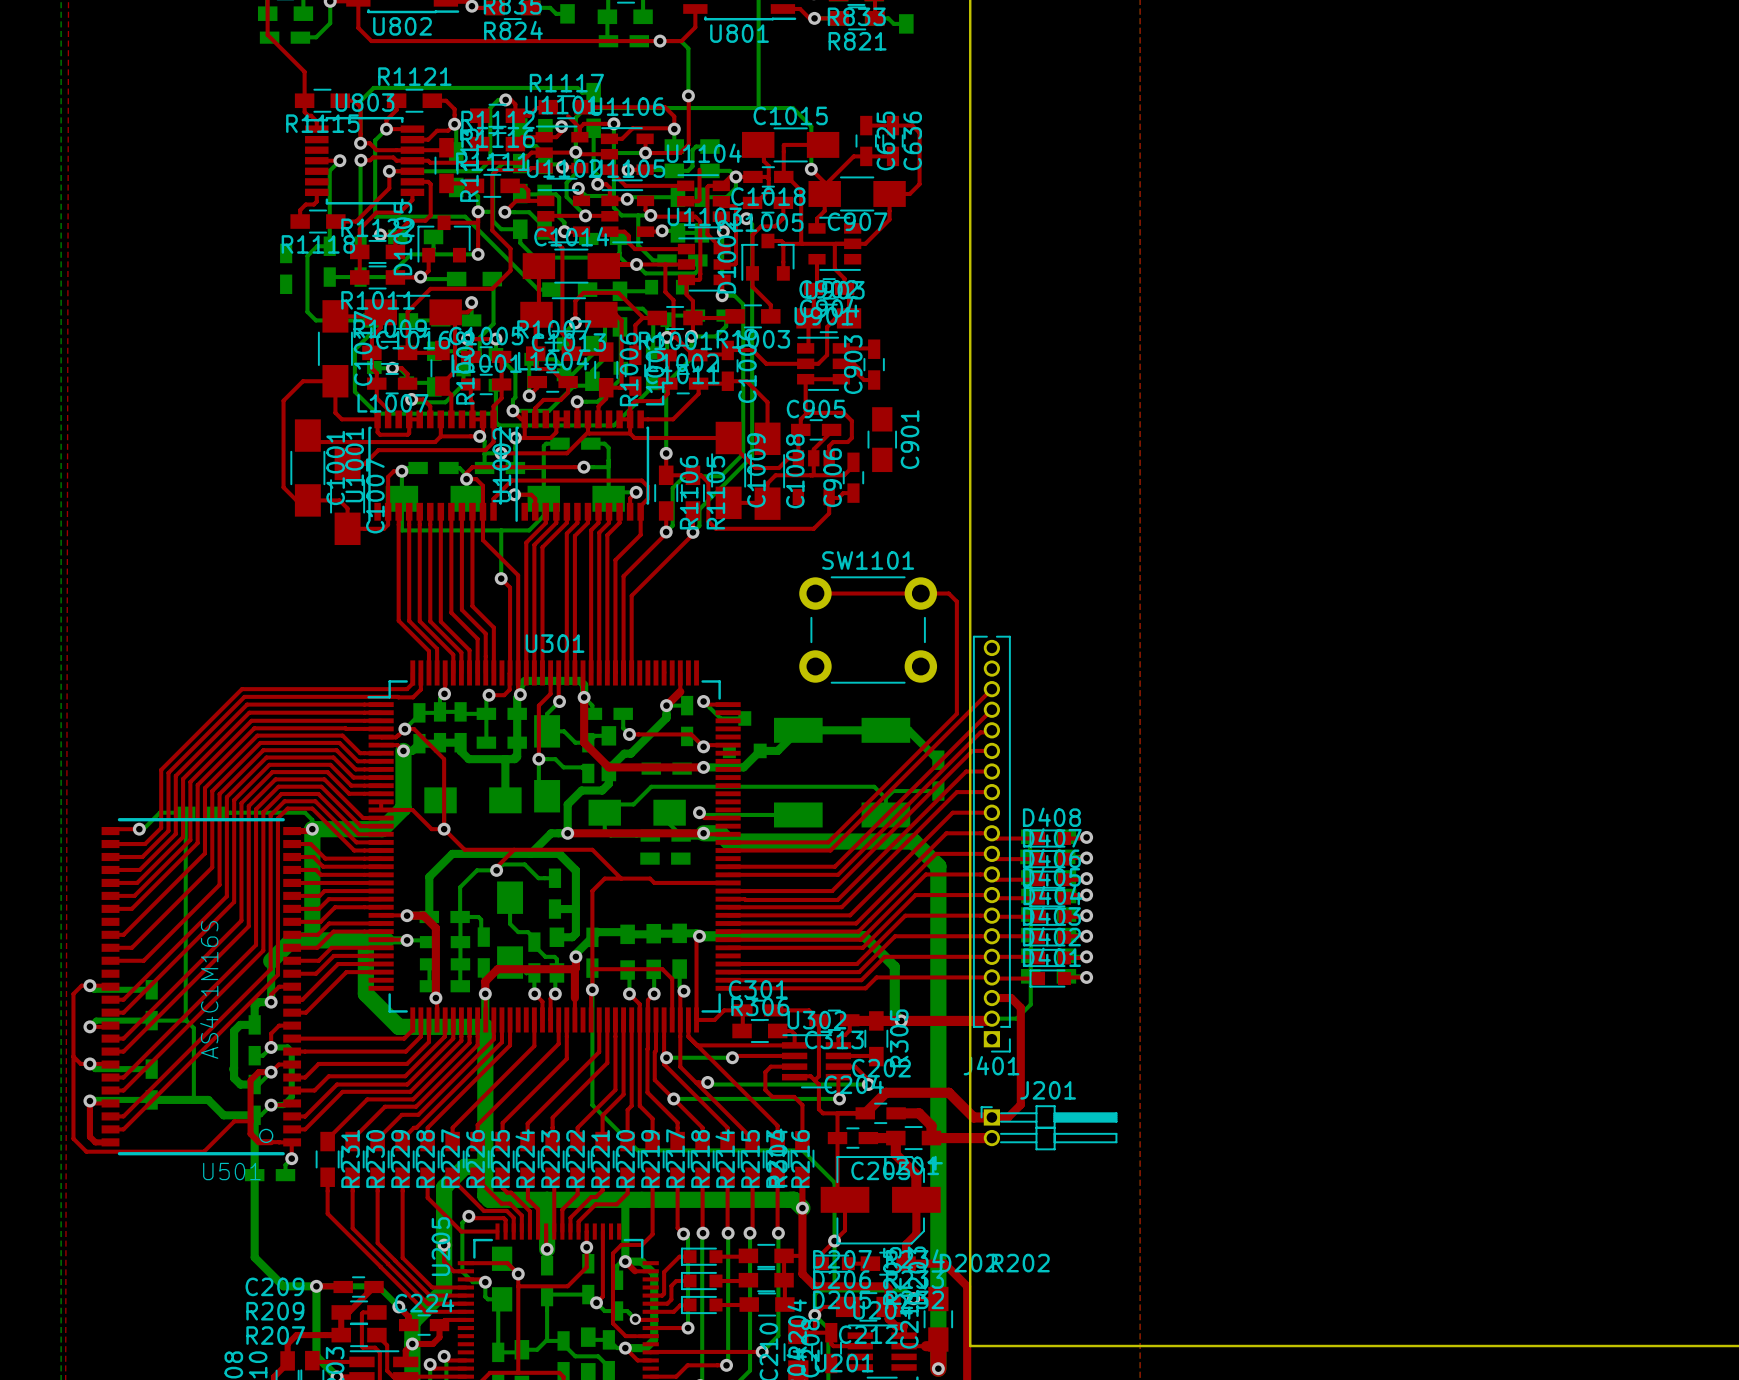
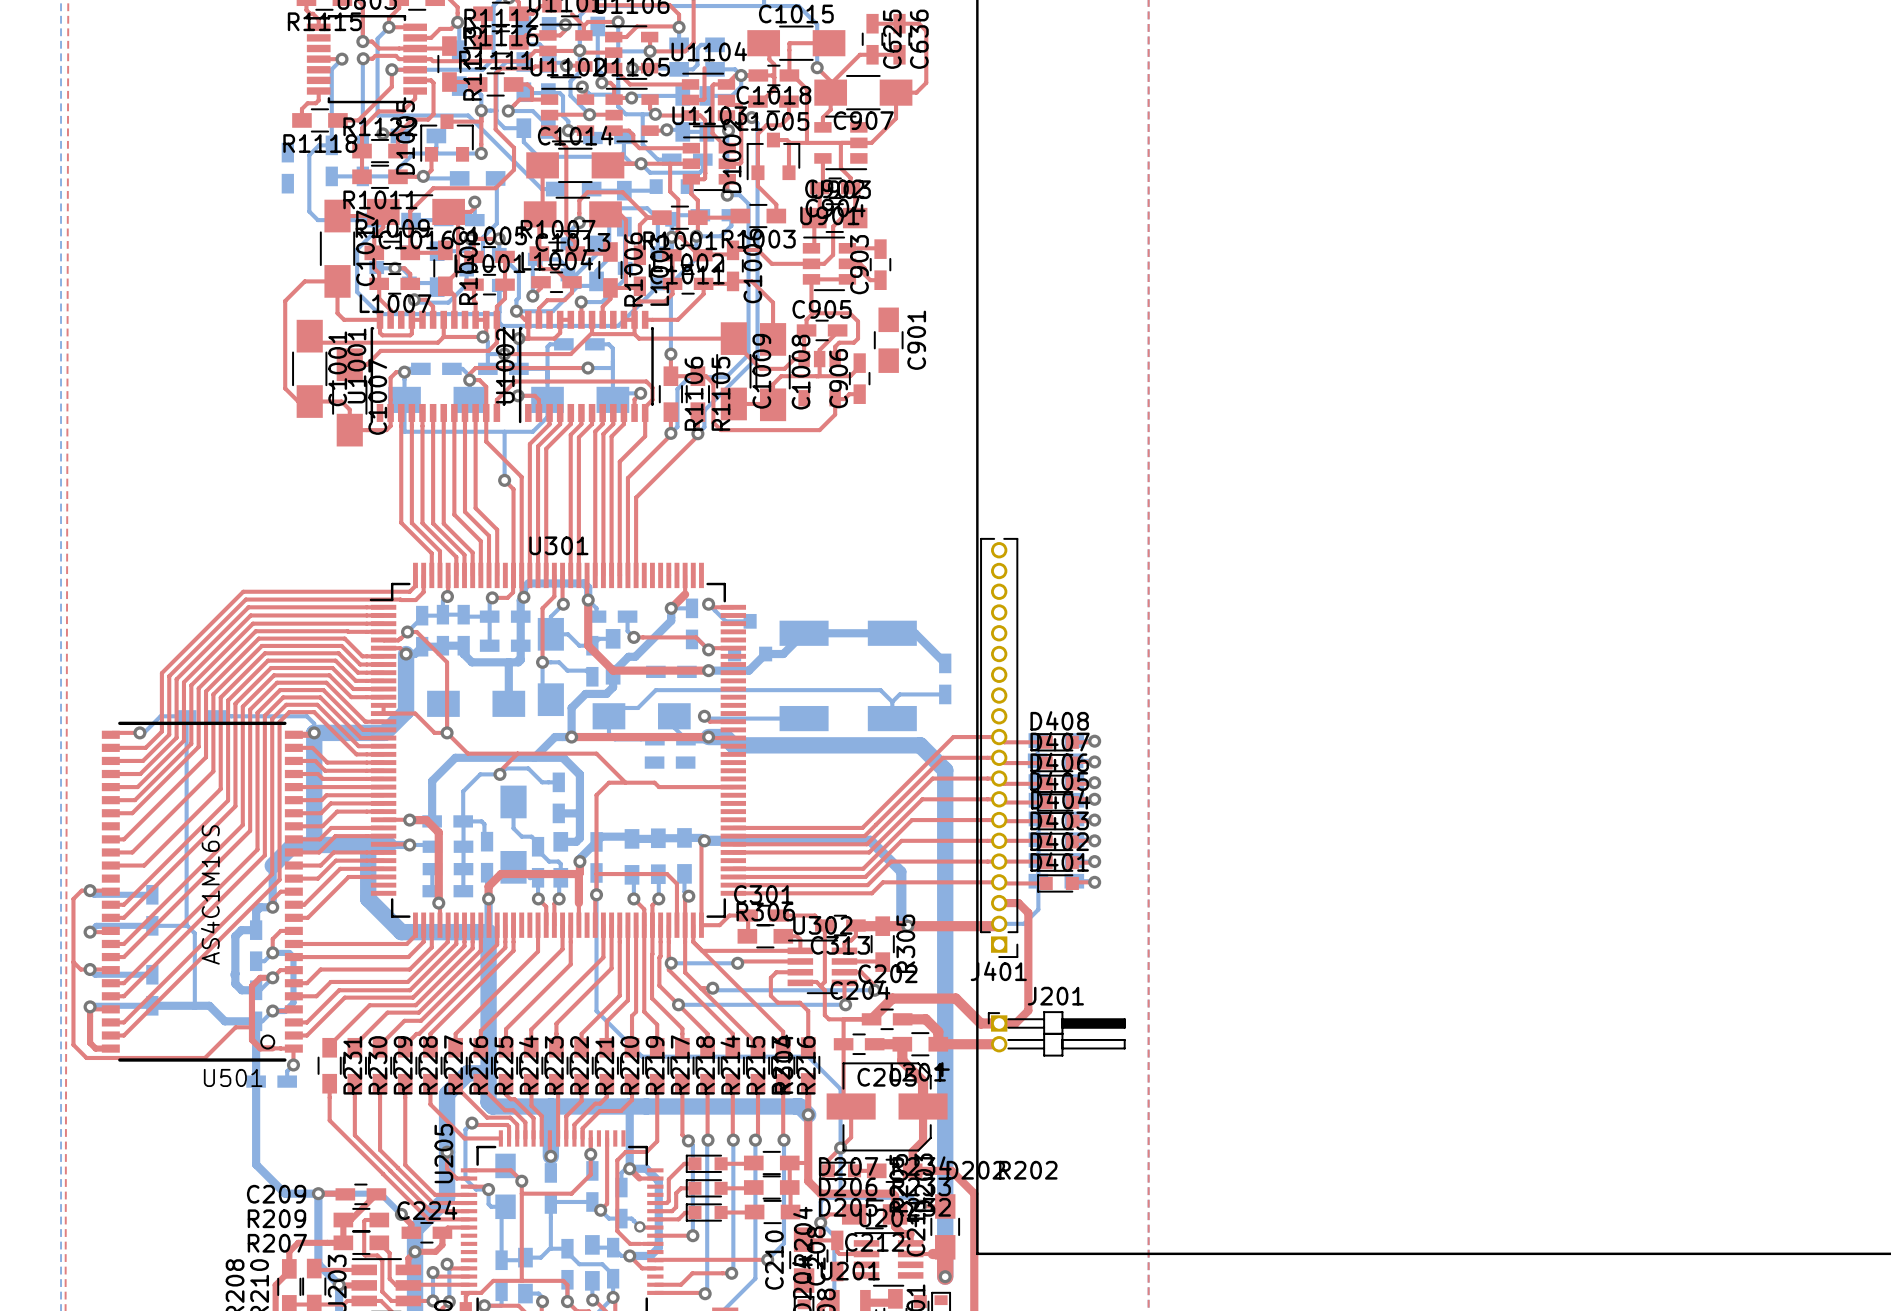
top track: (815, 593) (948, 593) (956, 601) (956, 713) (828, 842) (728, 842) -> none
SW1101: (868, 630) -> none
top track: (991, 689) (830, 850) (728, 850) -> none
top track: (991, 709) (834, 866) (728, 866) -> none
top track: (991, 730) (989, 732) (980, 732) (838, 874) (728, 874) -> none
top track: (991, 750) (972, 750) (832, 891) (728, 891) -> none
top track: (991, 771) (966, 771) (837, 899) (728, 899) -> none
top track: (991, 792) (956, 792) (841, 907) (728, 907) -> none
top track: (991, 812) (952, 812) (850, 915) (728, 915) -> none

